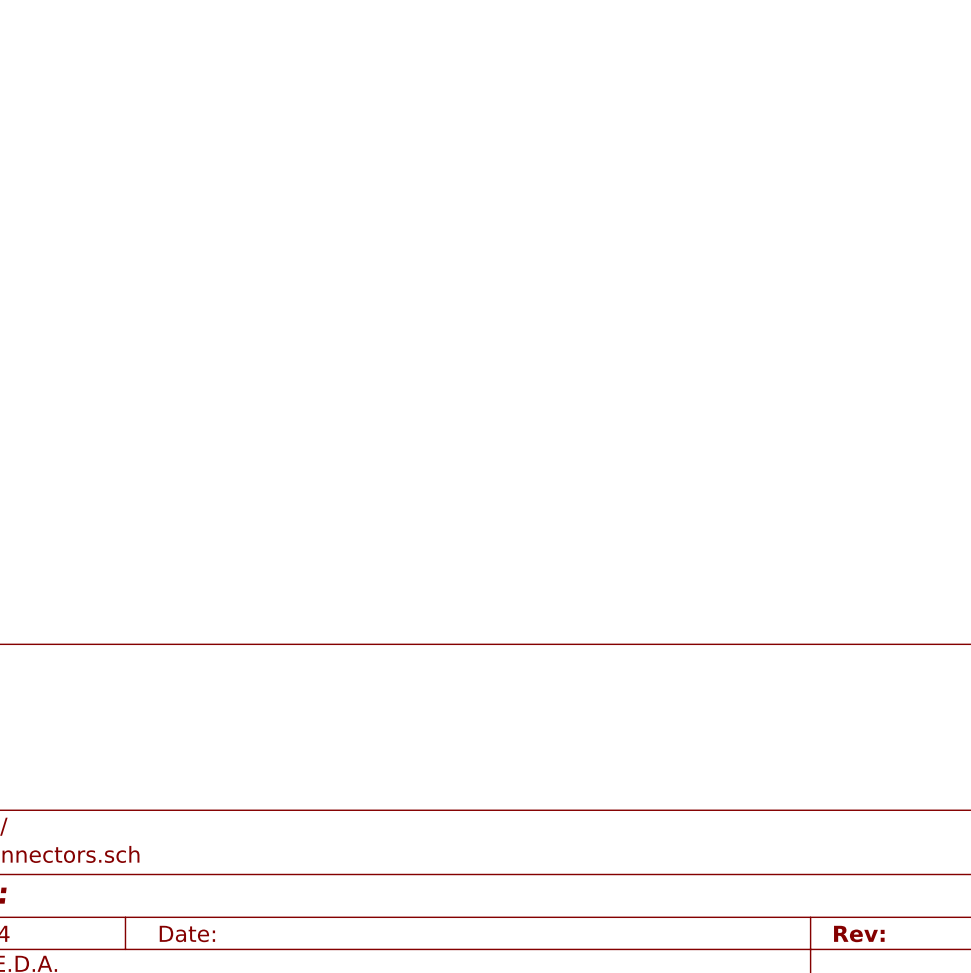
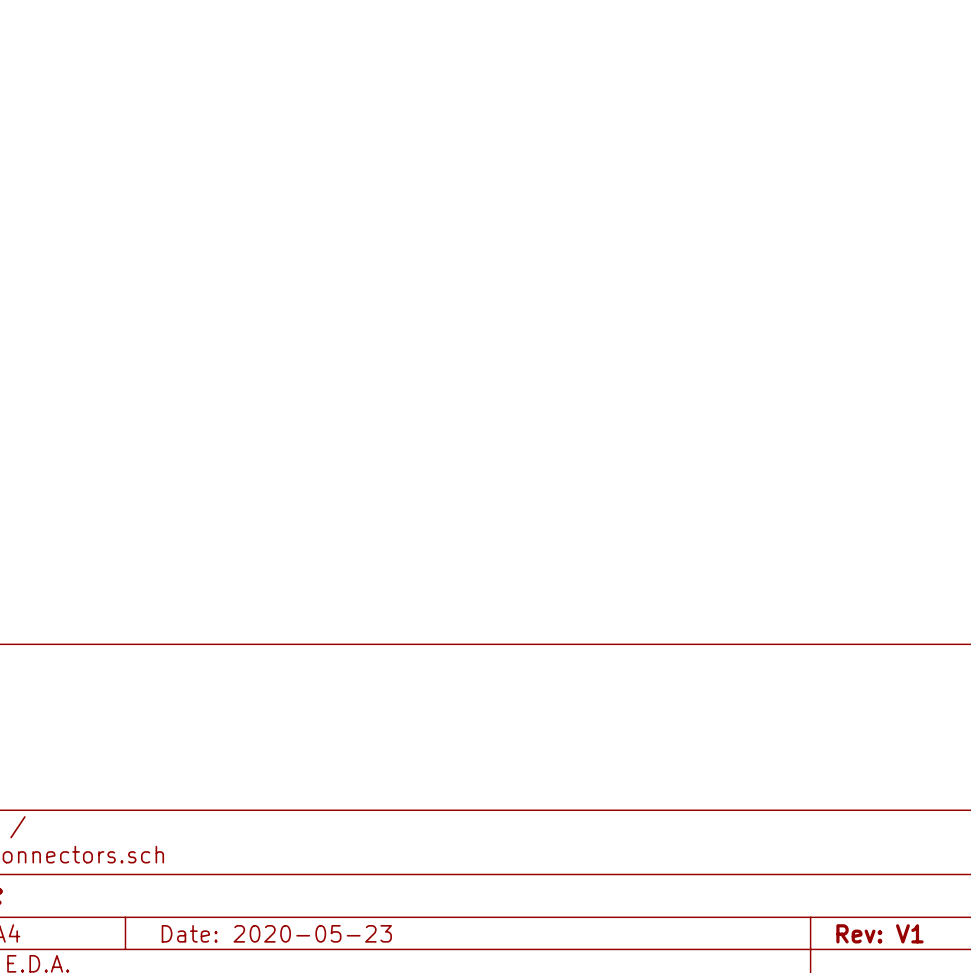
title block: Date: (187, 934) -> Date: 2020-05-23 (276, 933)
title block: Rev: (859, 934) -> Rev: V1 (879, 933)

